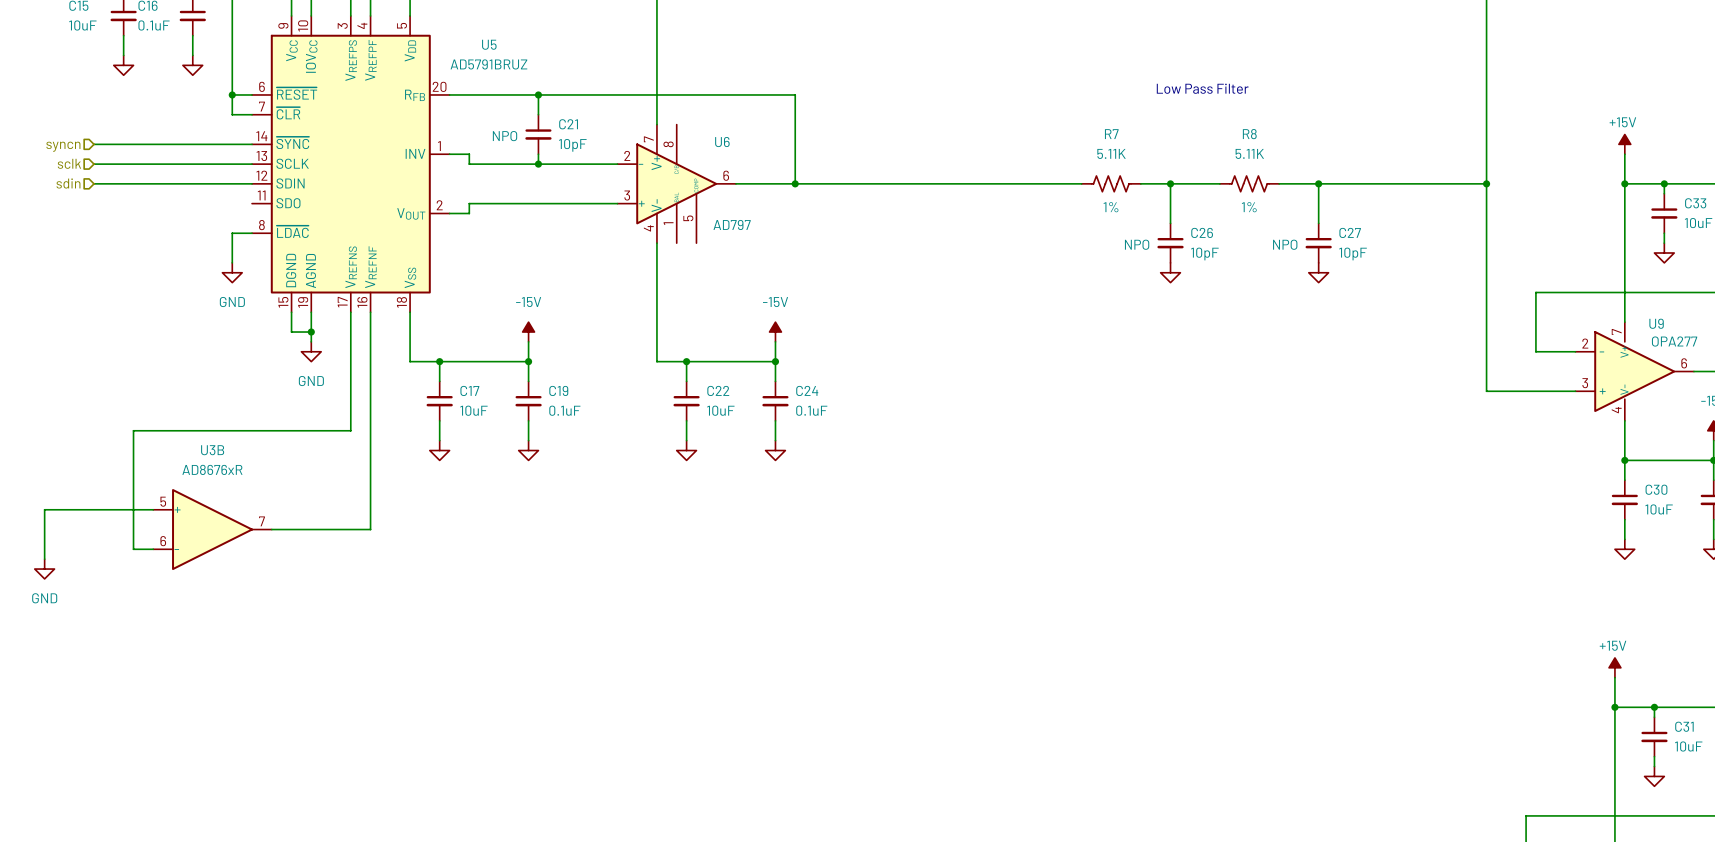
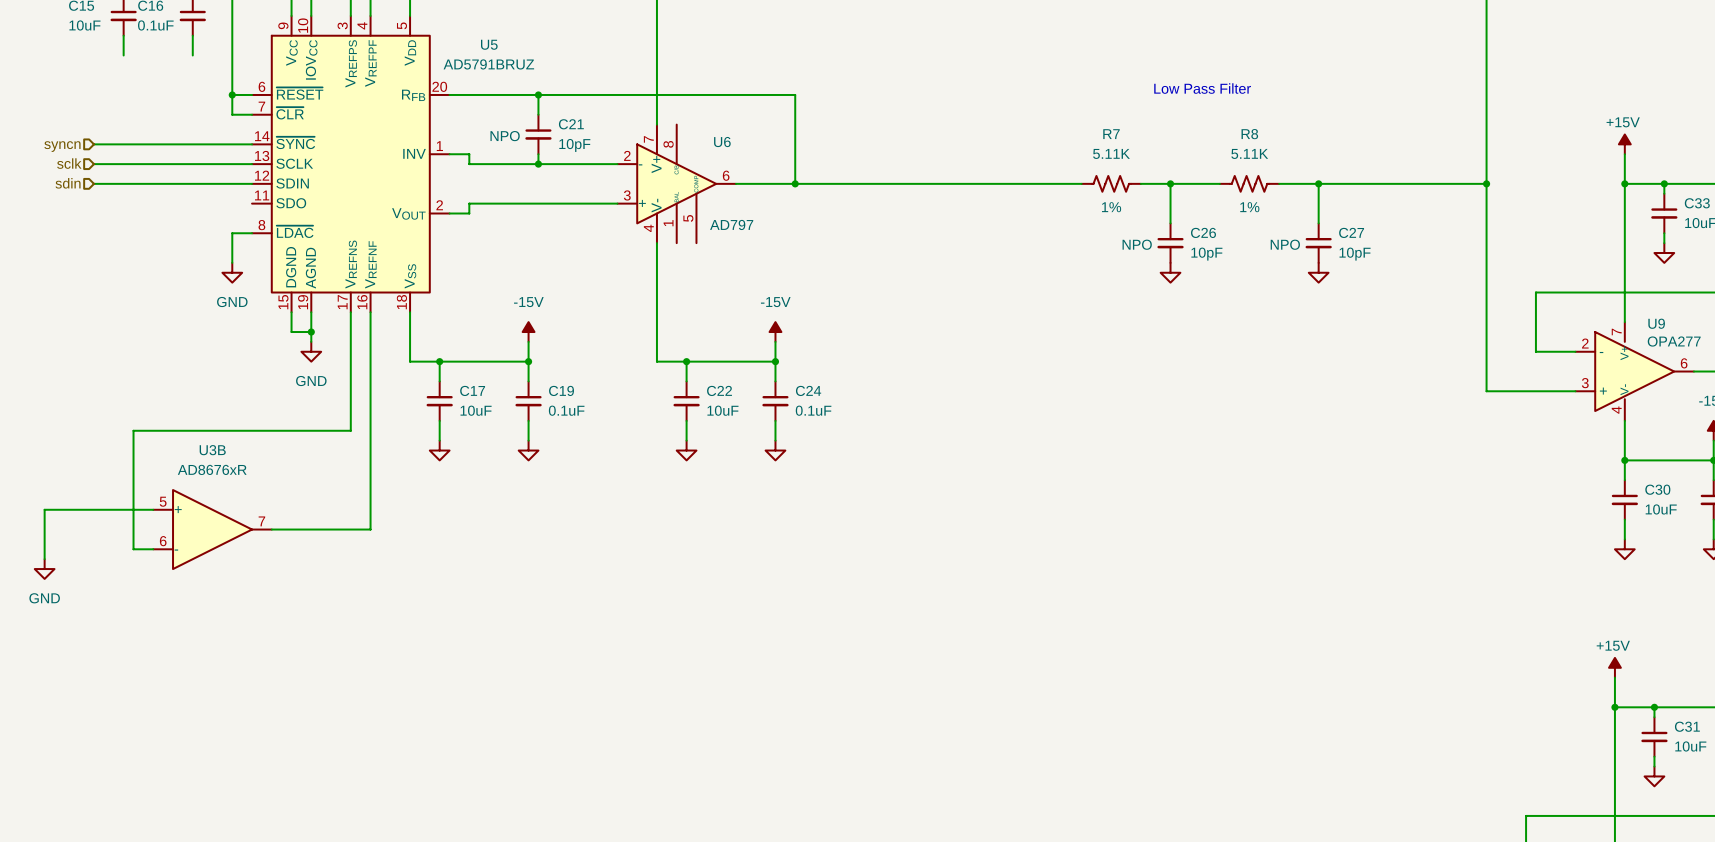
power symbol: (123, 65) -> none
power symbol: (192, 65) -> none

